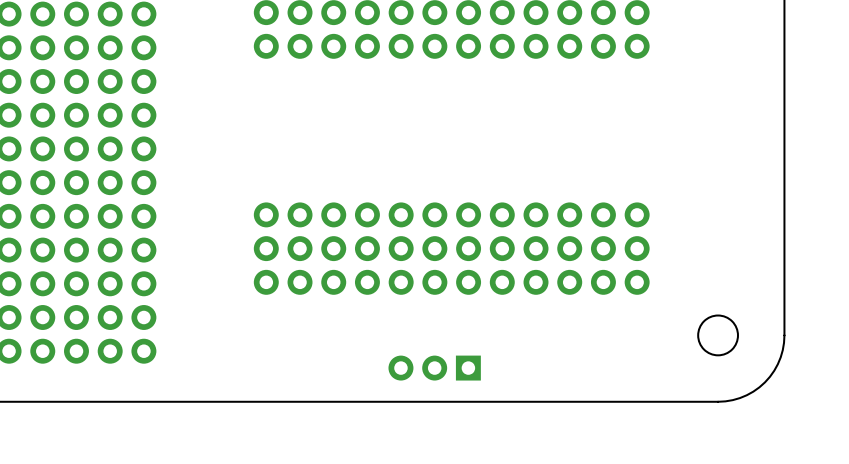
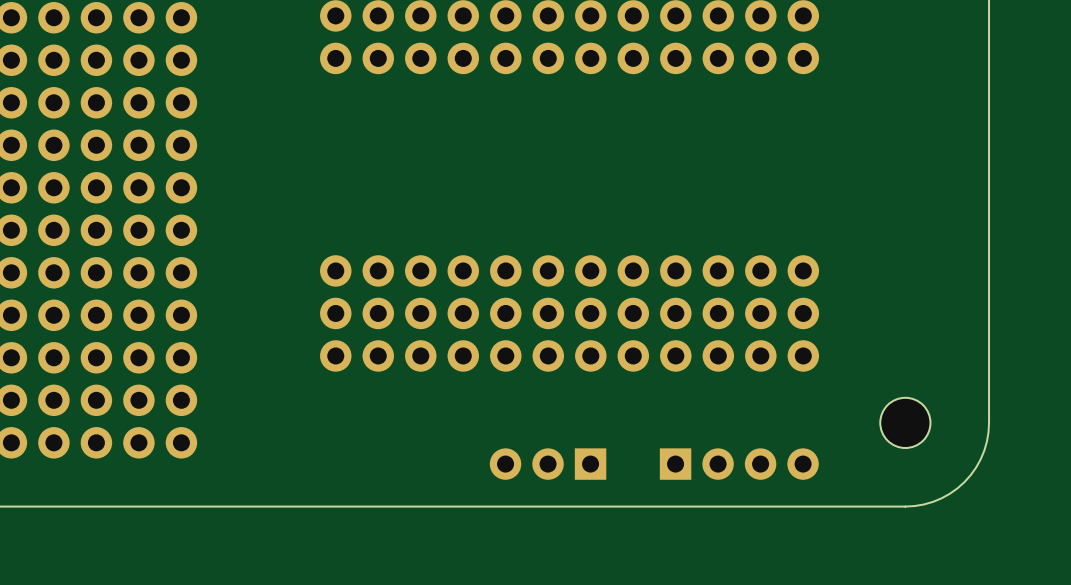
part: none -> (739, 464)

